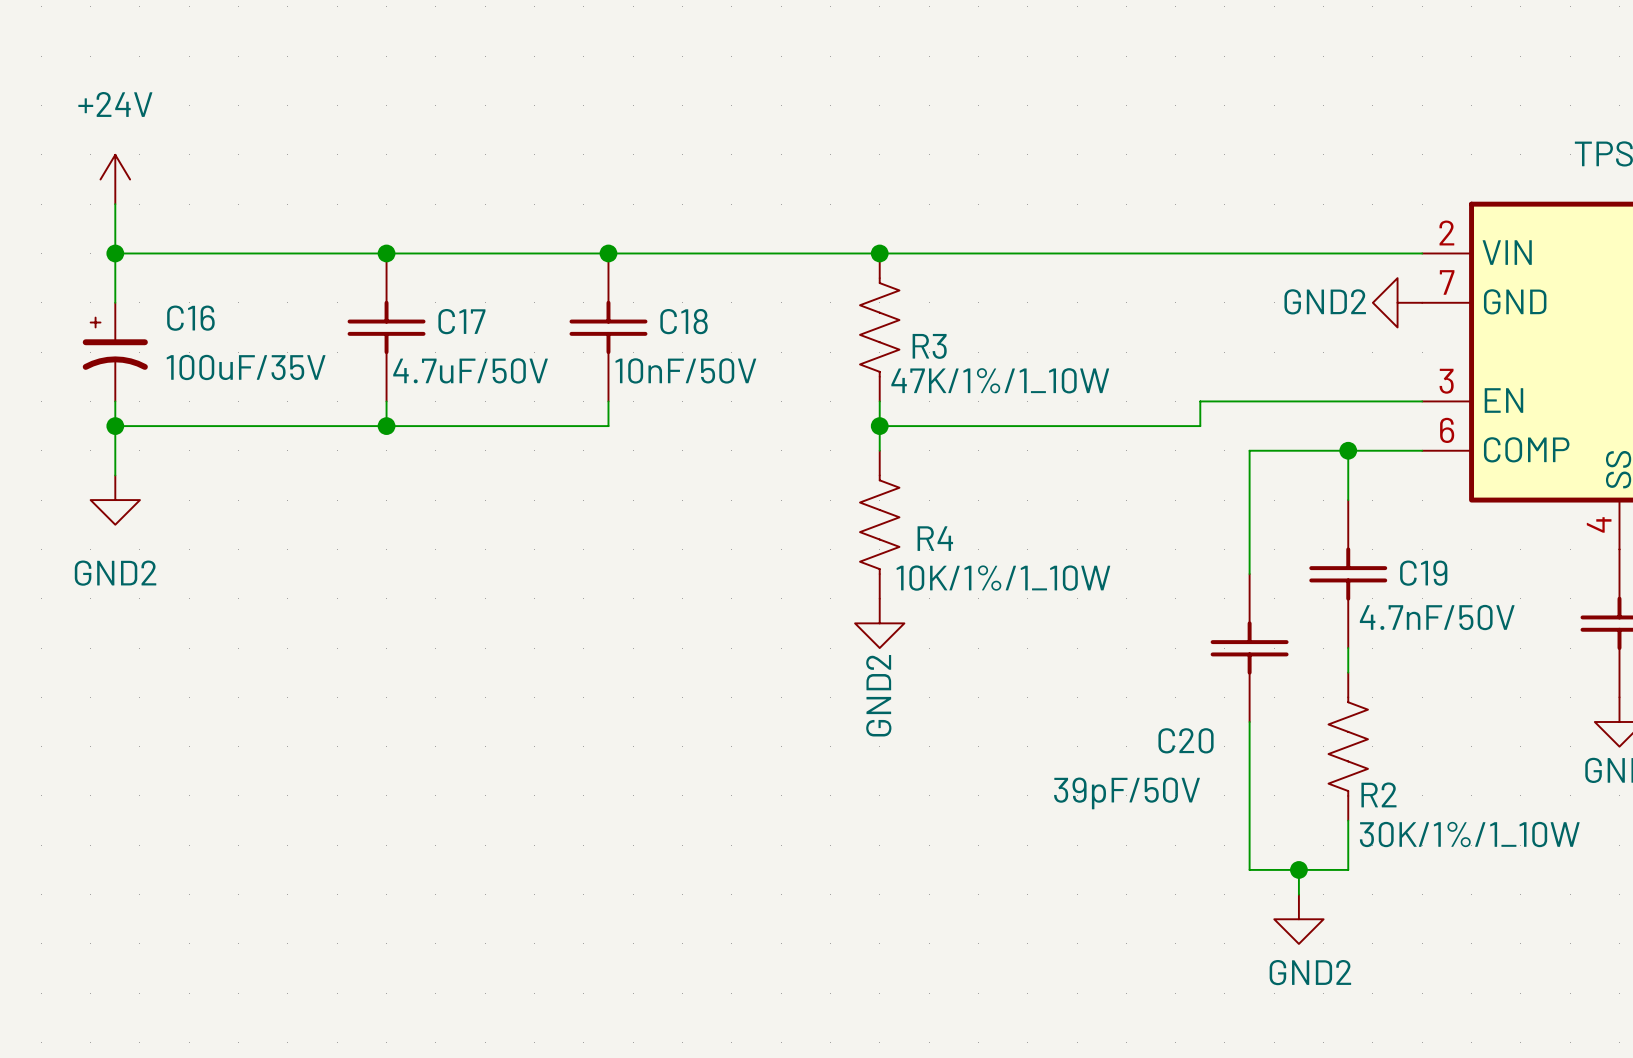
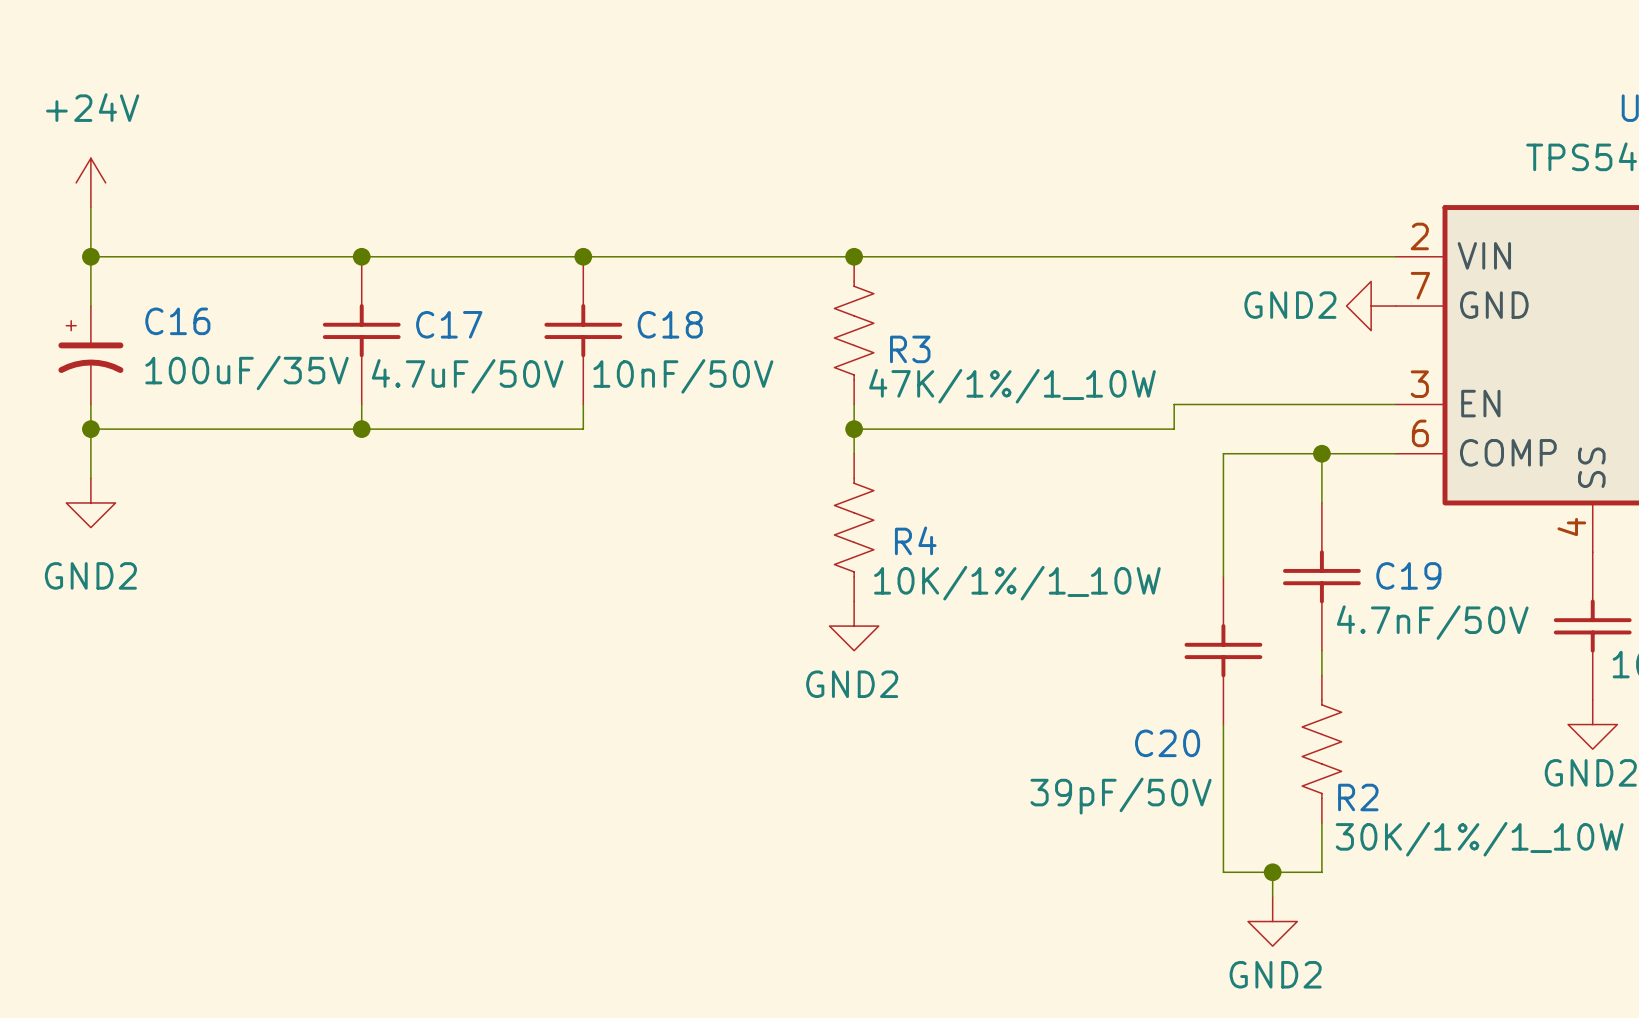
power symbol text rotation: 0° (878, 695) -> 90° clockwise (852, 684)

